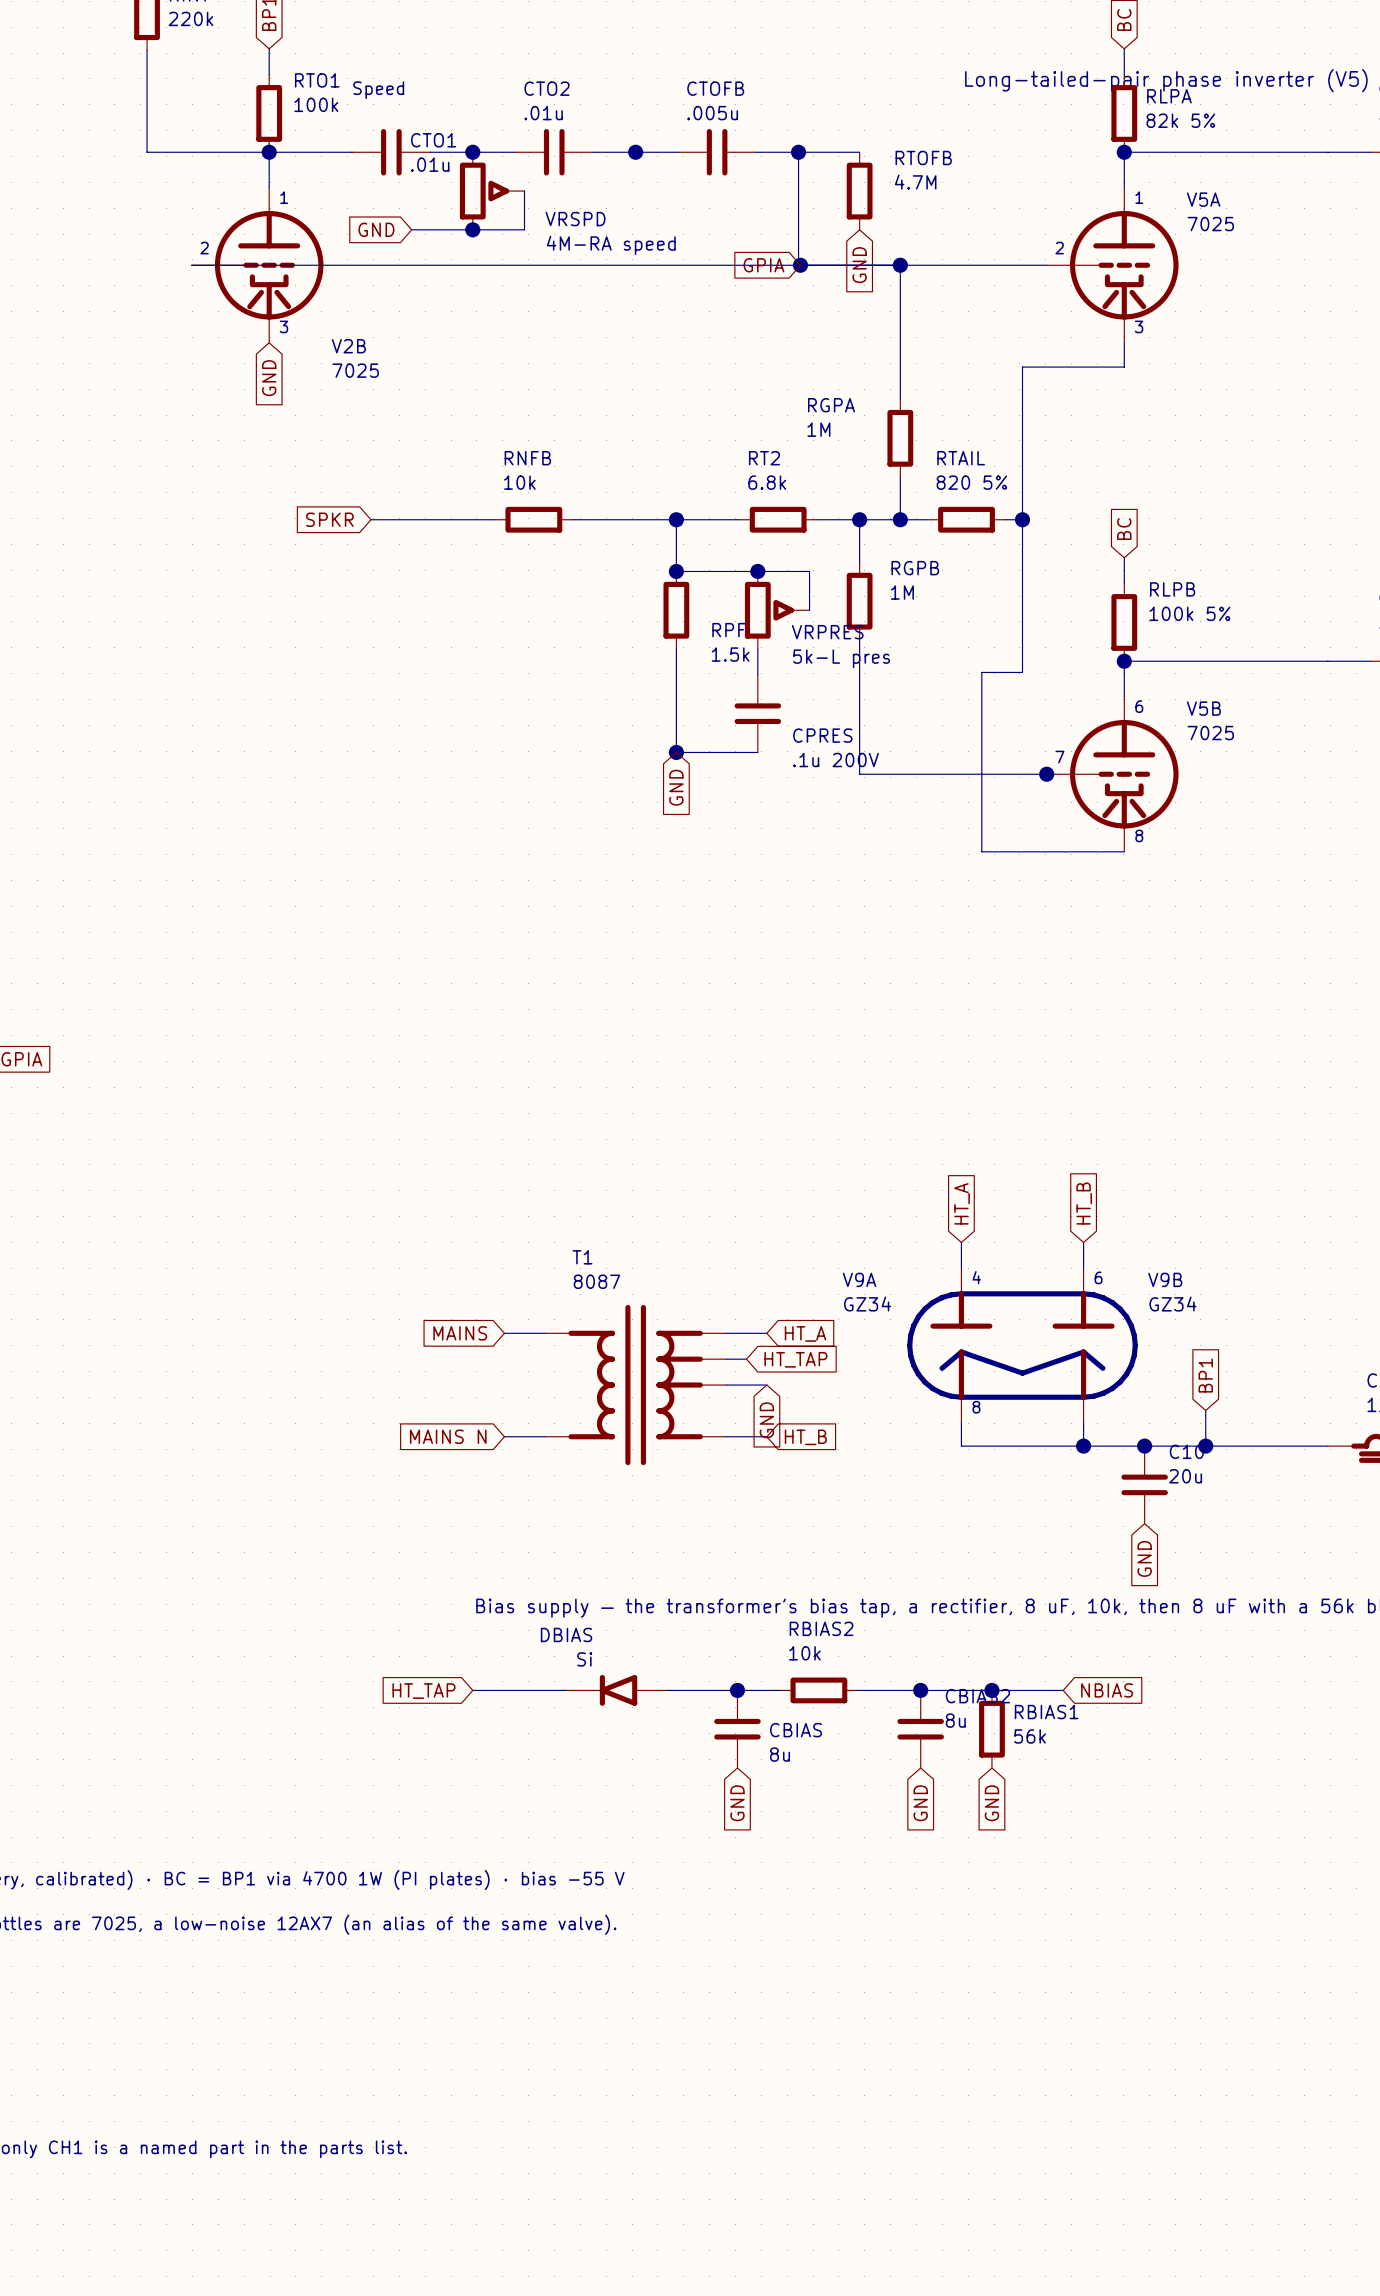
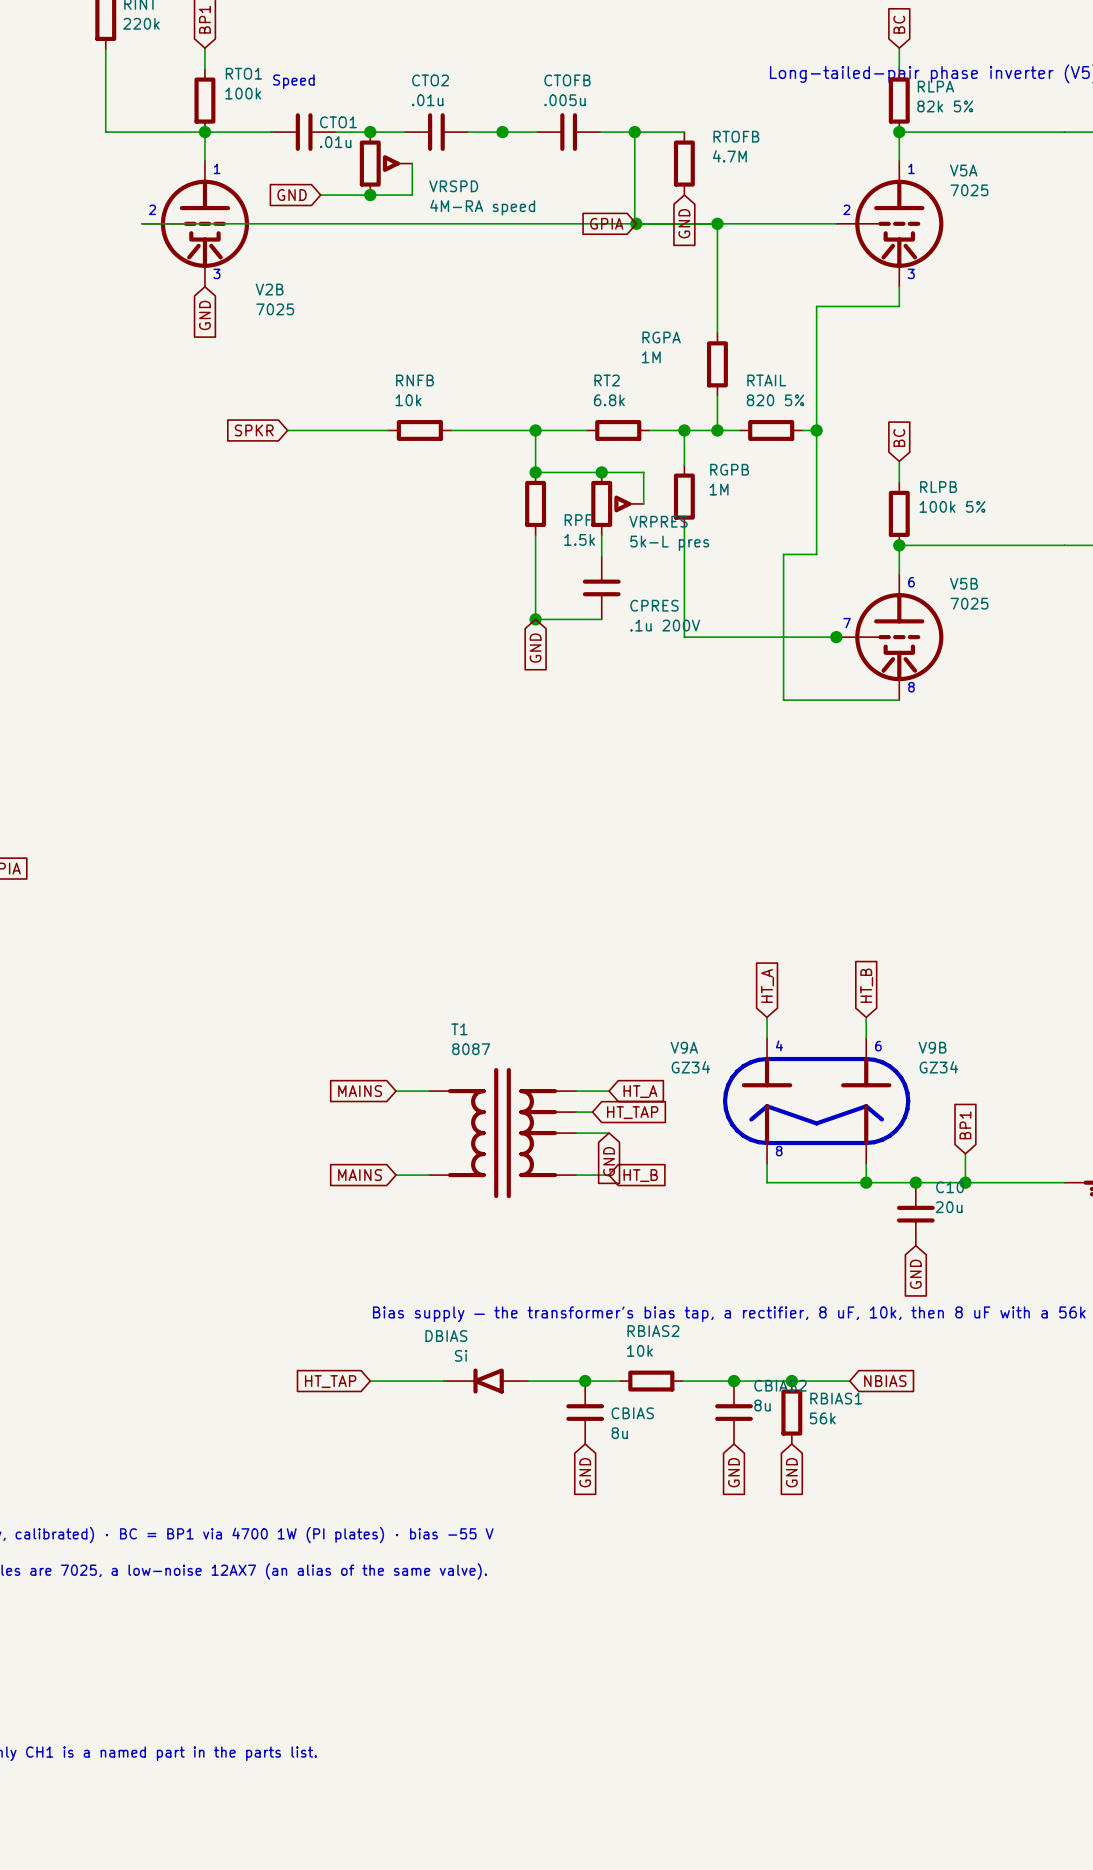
global label: MAINS N (448, 1436) -> MAINS (360, 1175)

